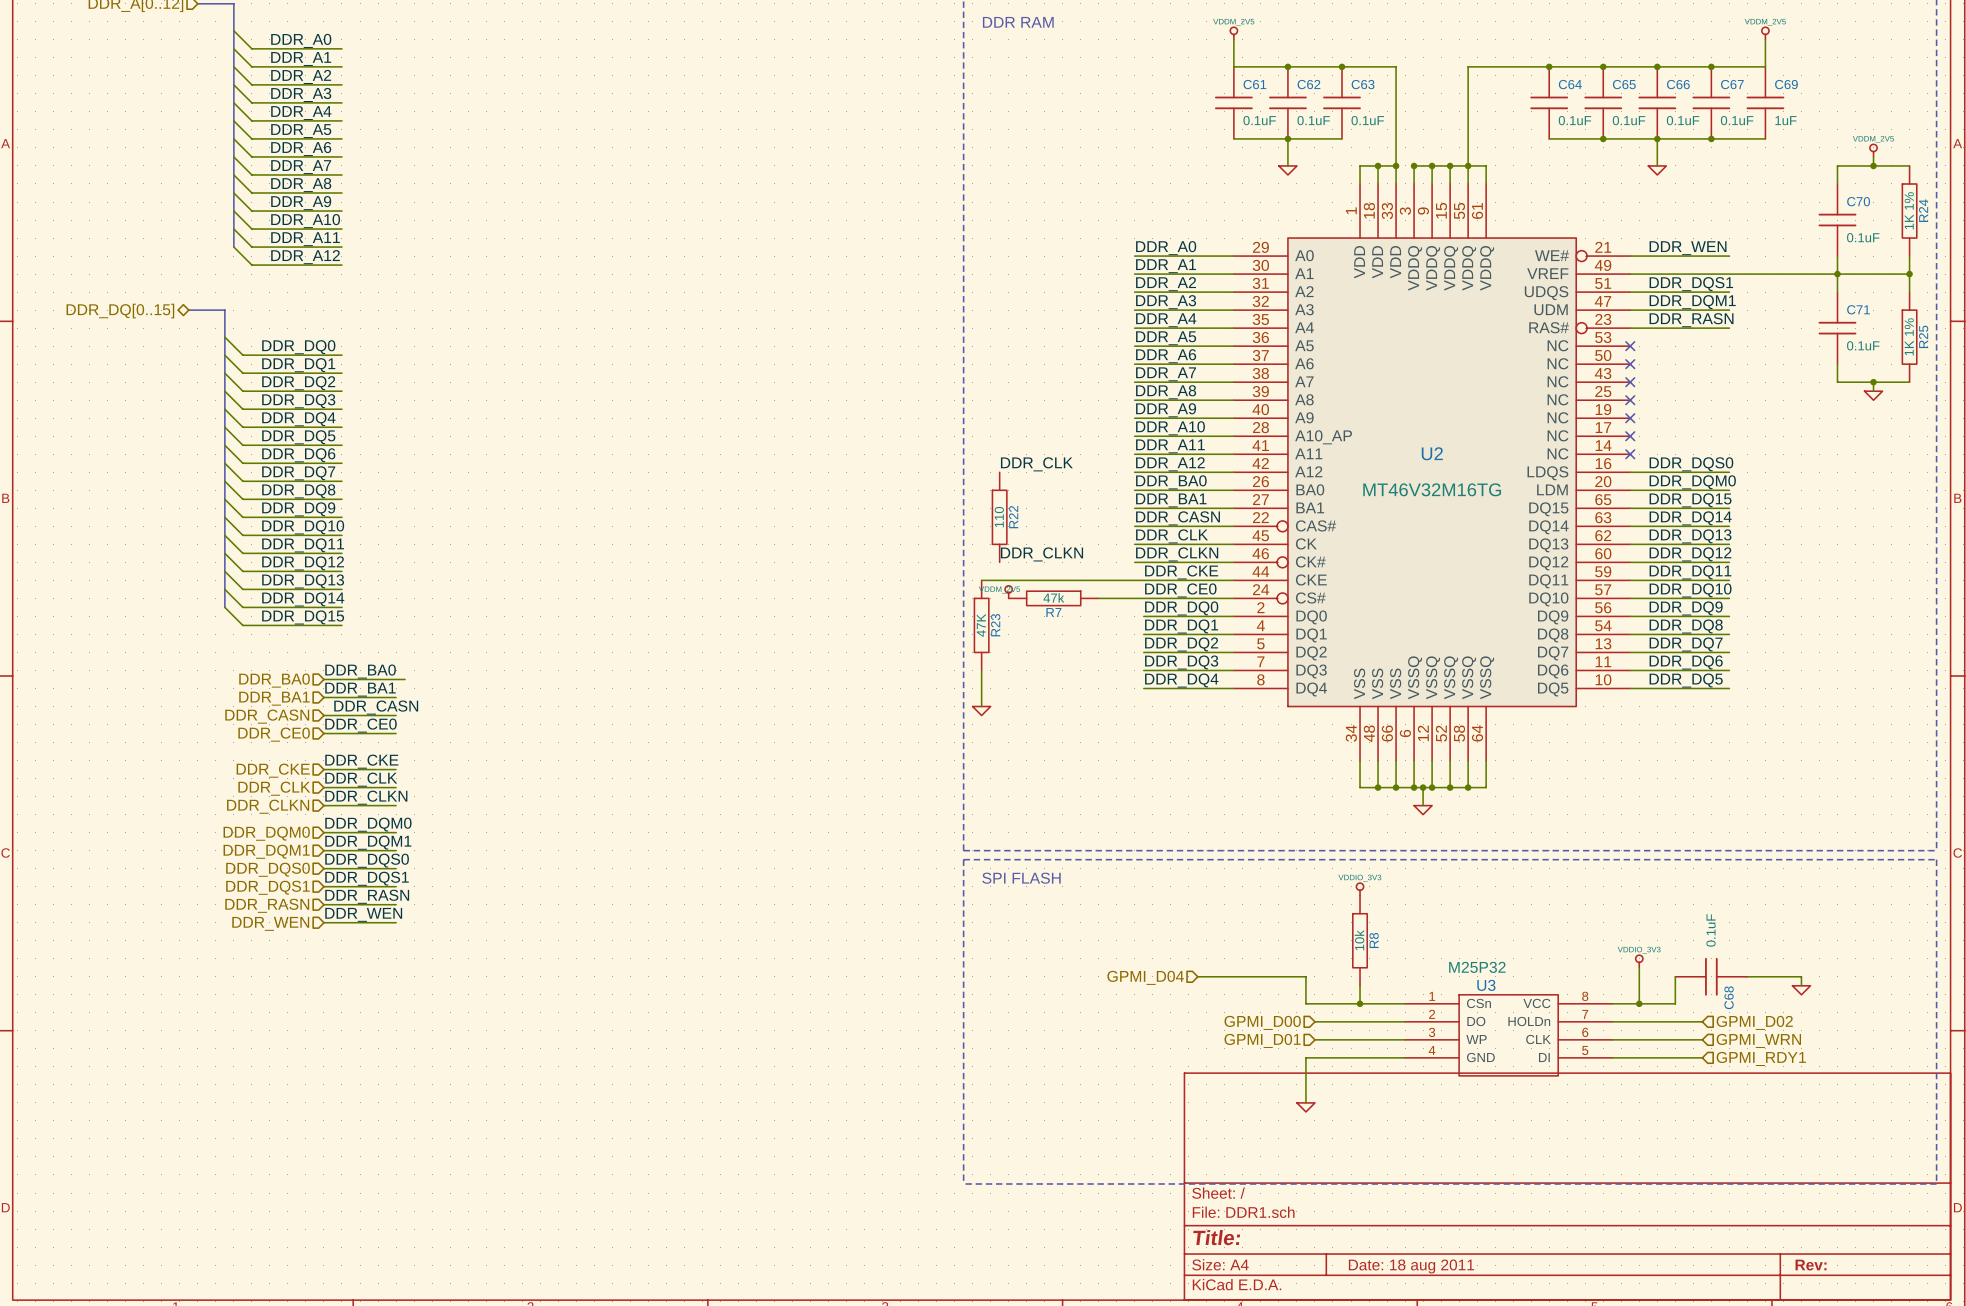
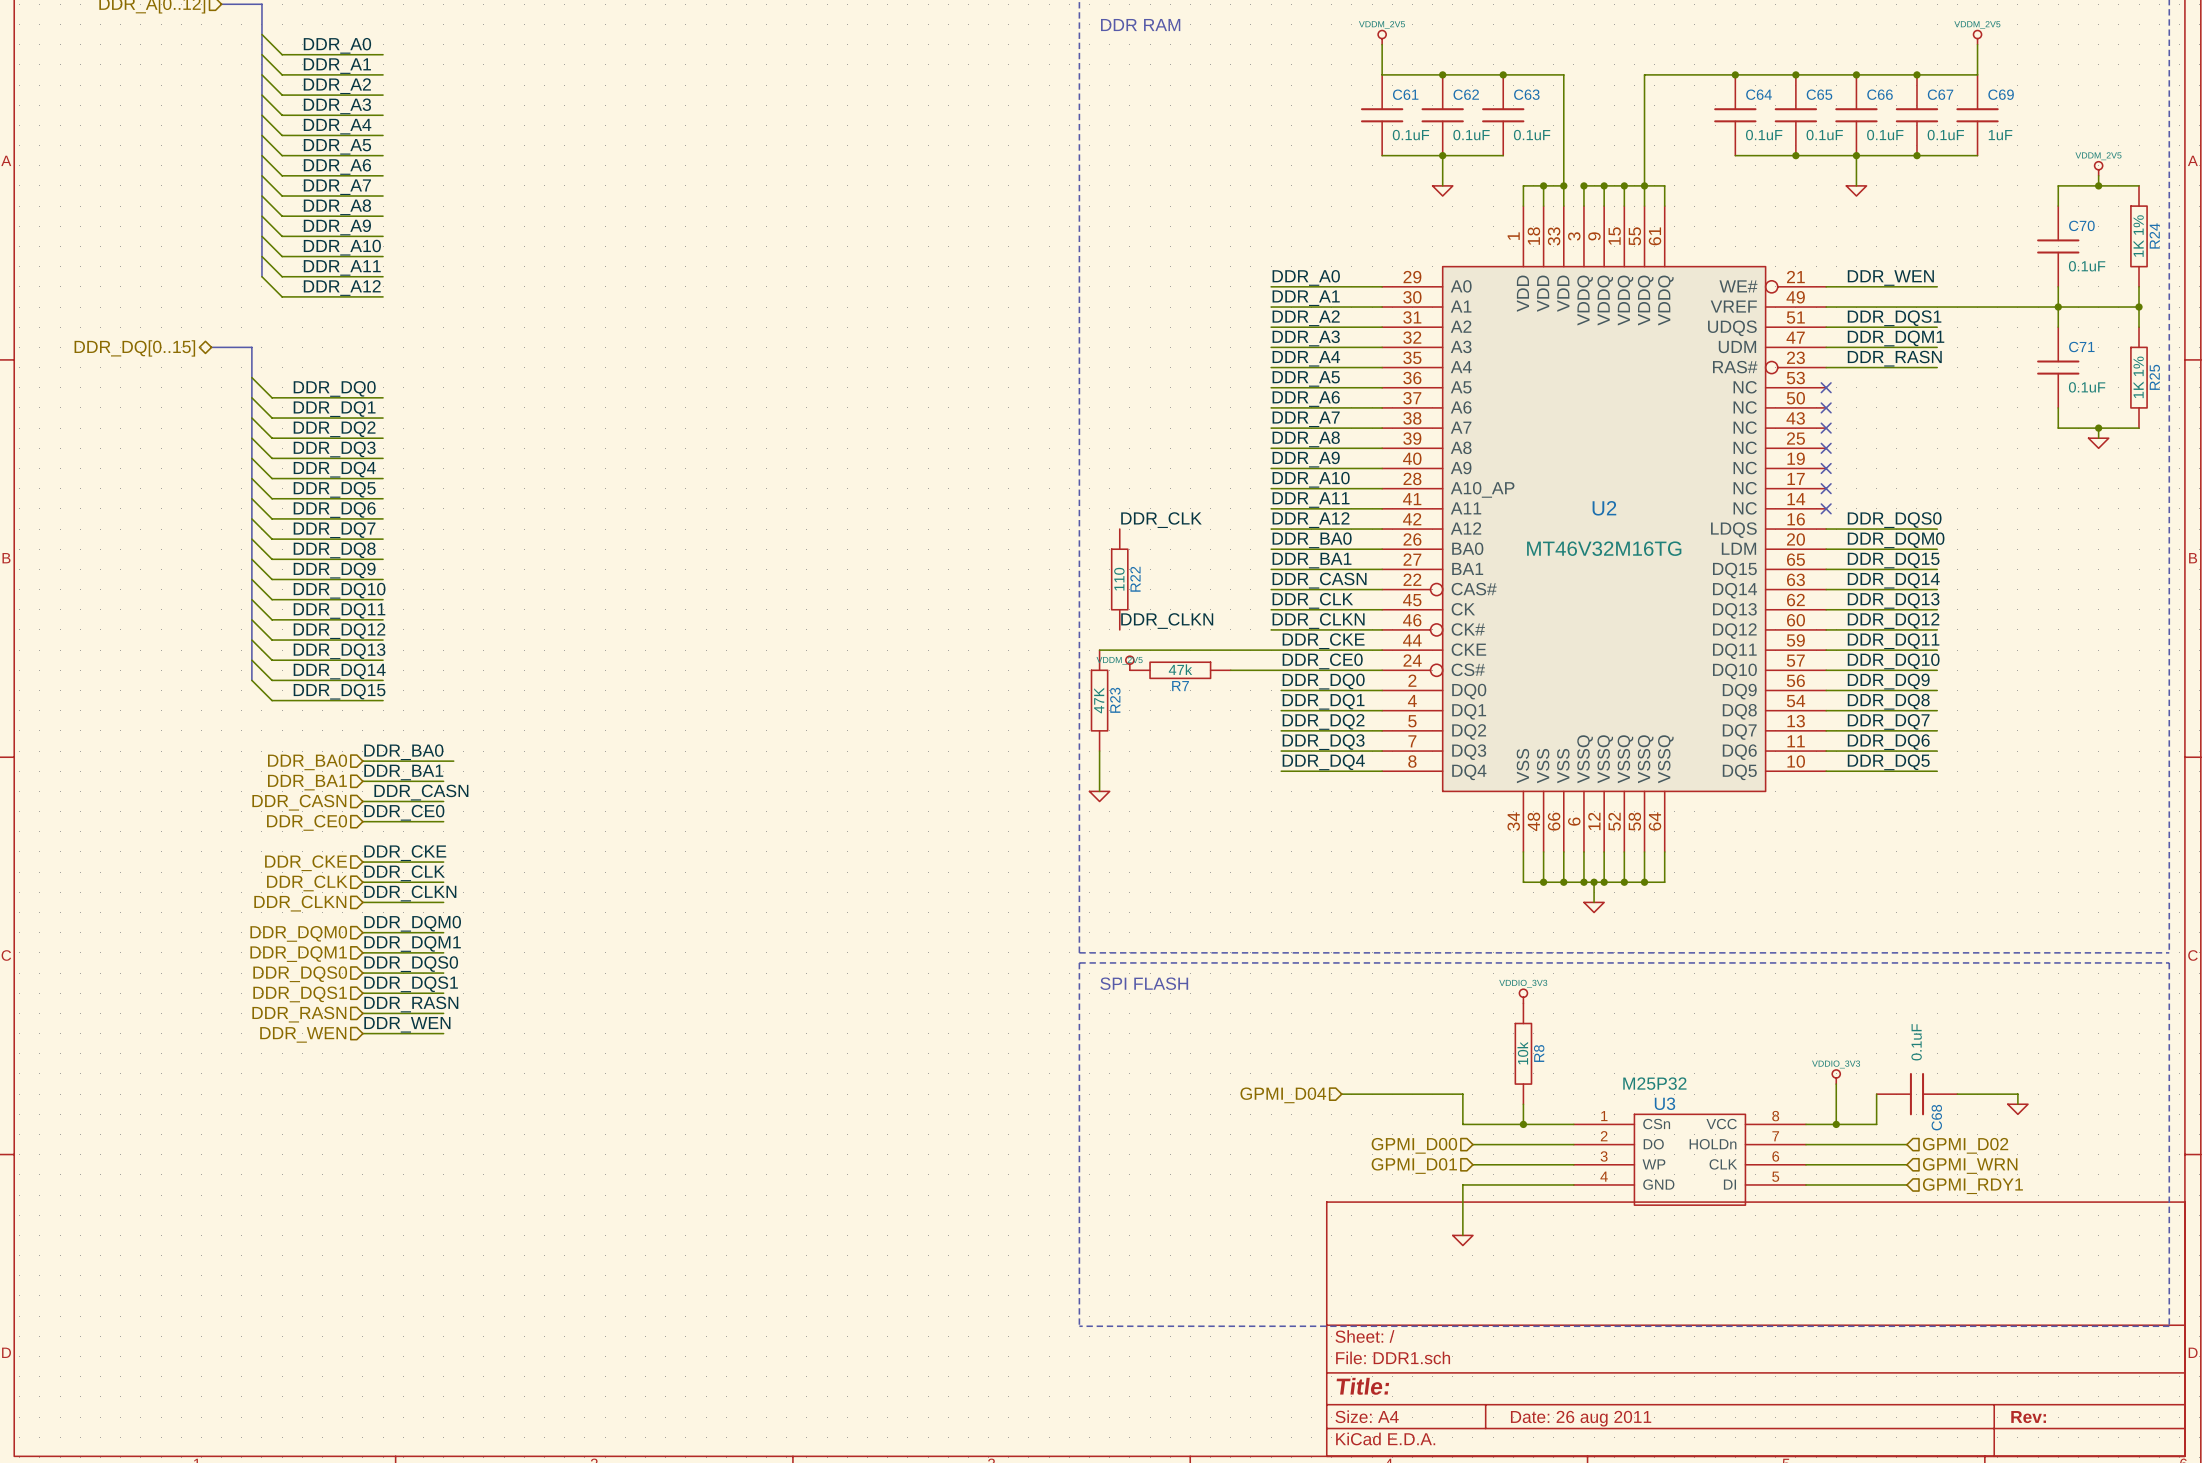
title block: Date: 18 aug 2011 (1411, 1266) -> Date: 26 aug 2011 (1581, 1418)

